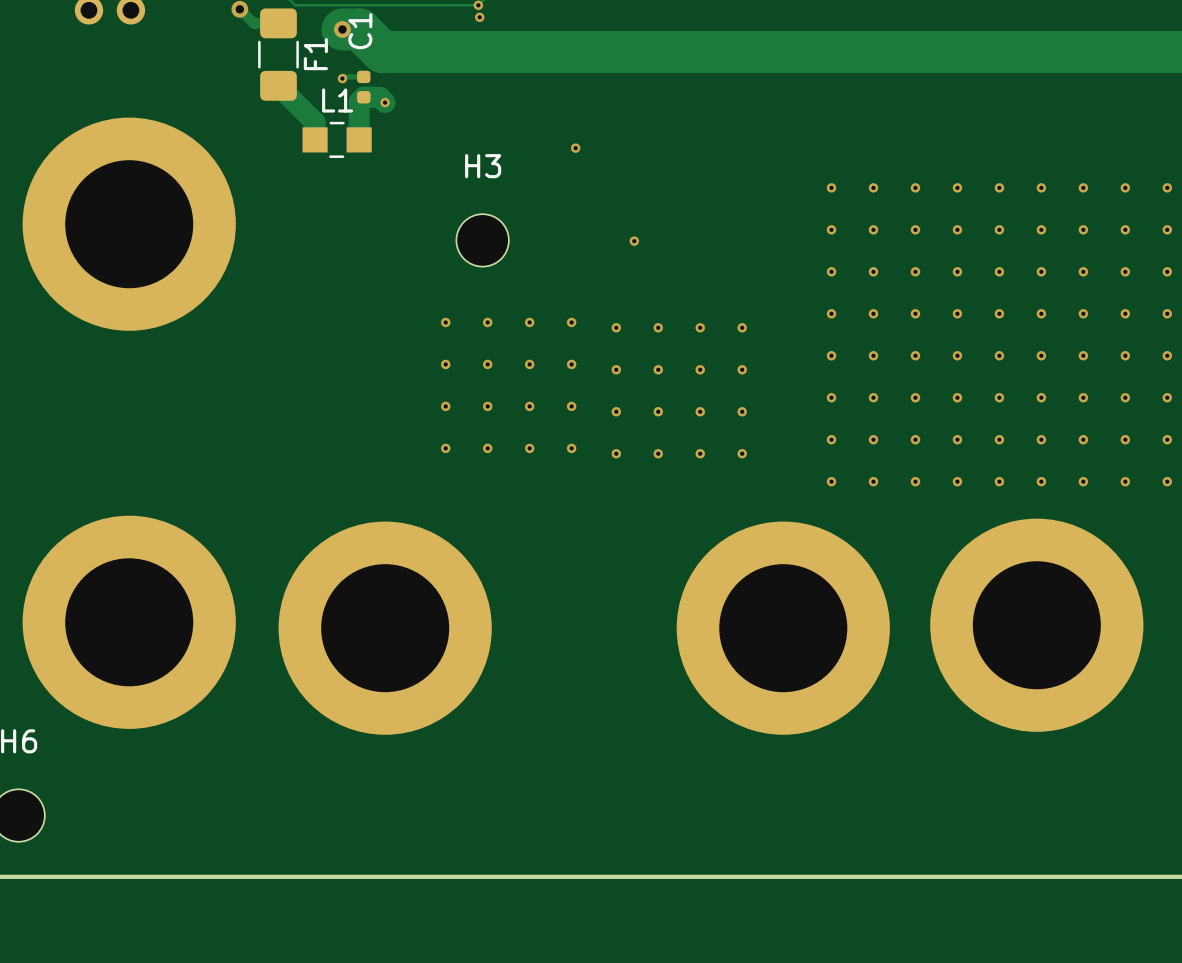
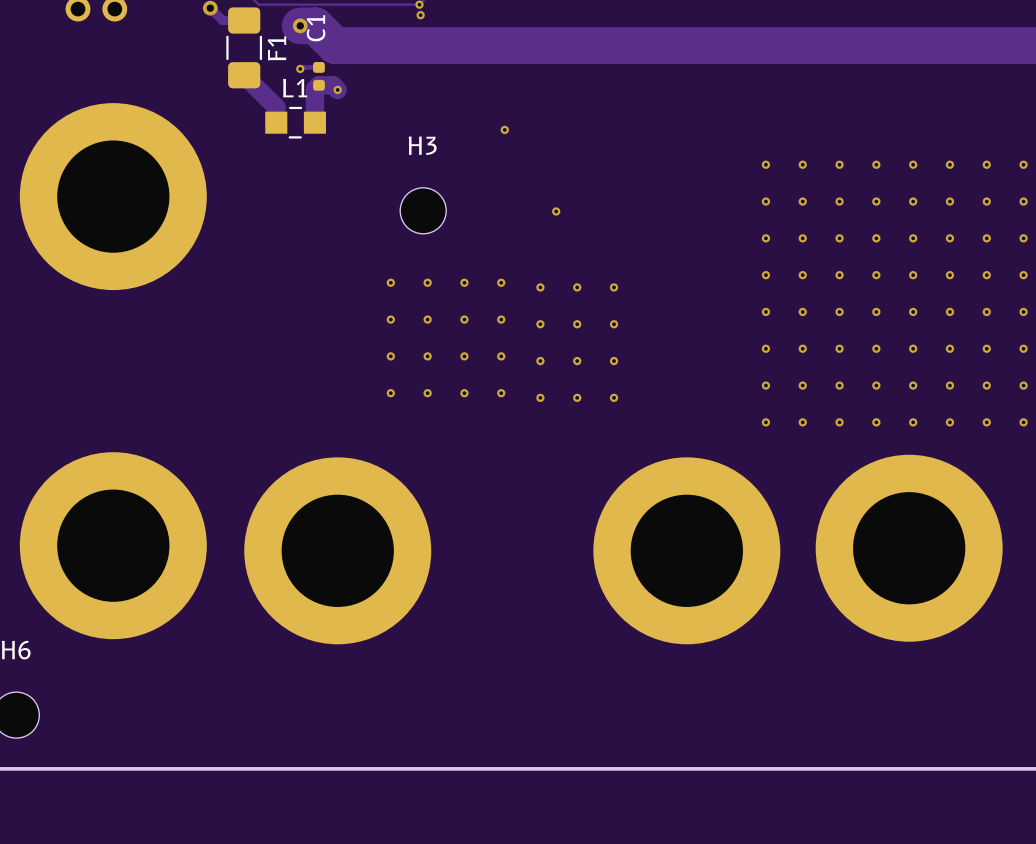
via: (831, 187) -> none
via: (831, 229) -> none
via: (831, 271) -> none
via: (831, 313) -> none
via: (742, 327) -> none
via: (831, 355) -> none
via: (742, 369) -> none
via: (831, 397) -> none
via: (742, 411) -> none
via: (831, 439) -> none
via: (742, 453) -> none
via: (831, 481) -> none

